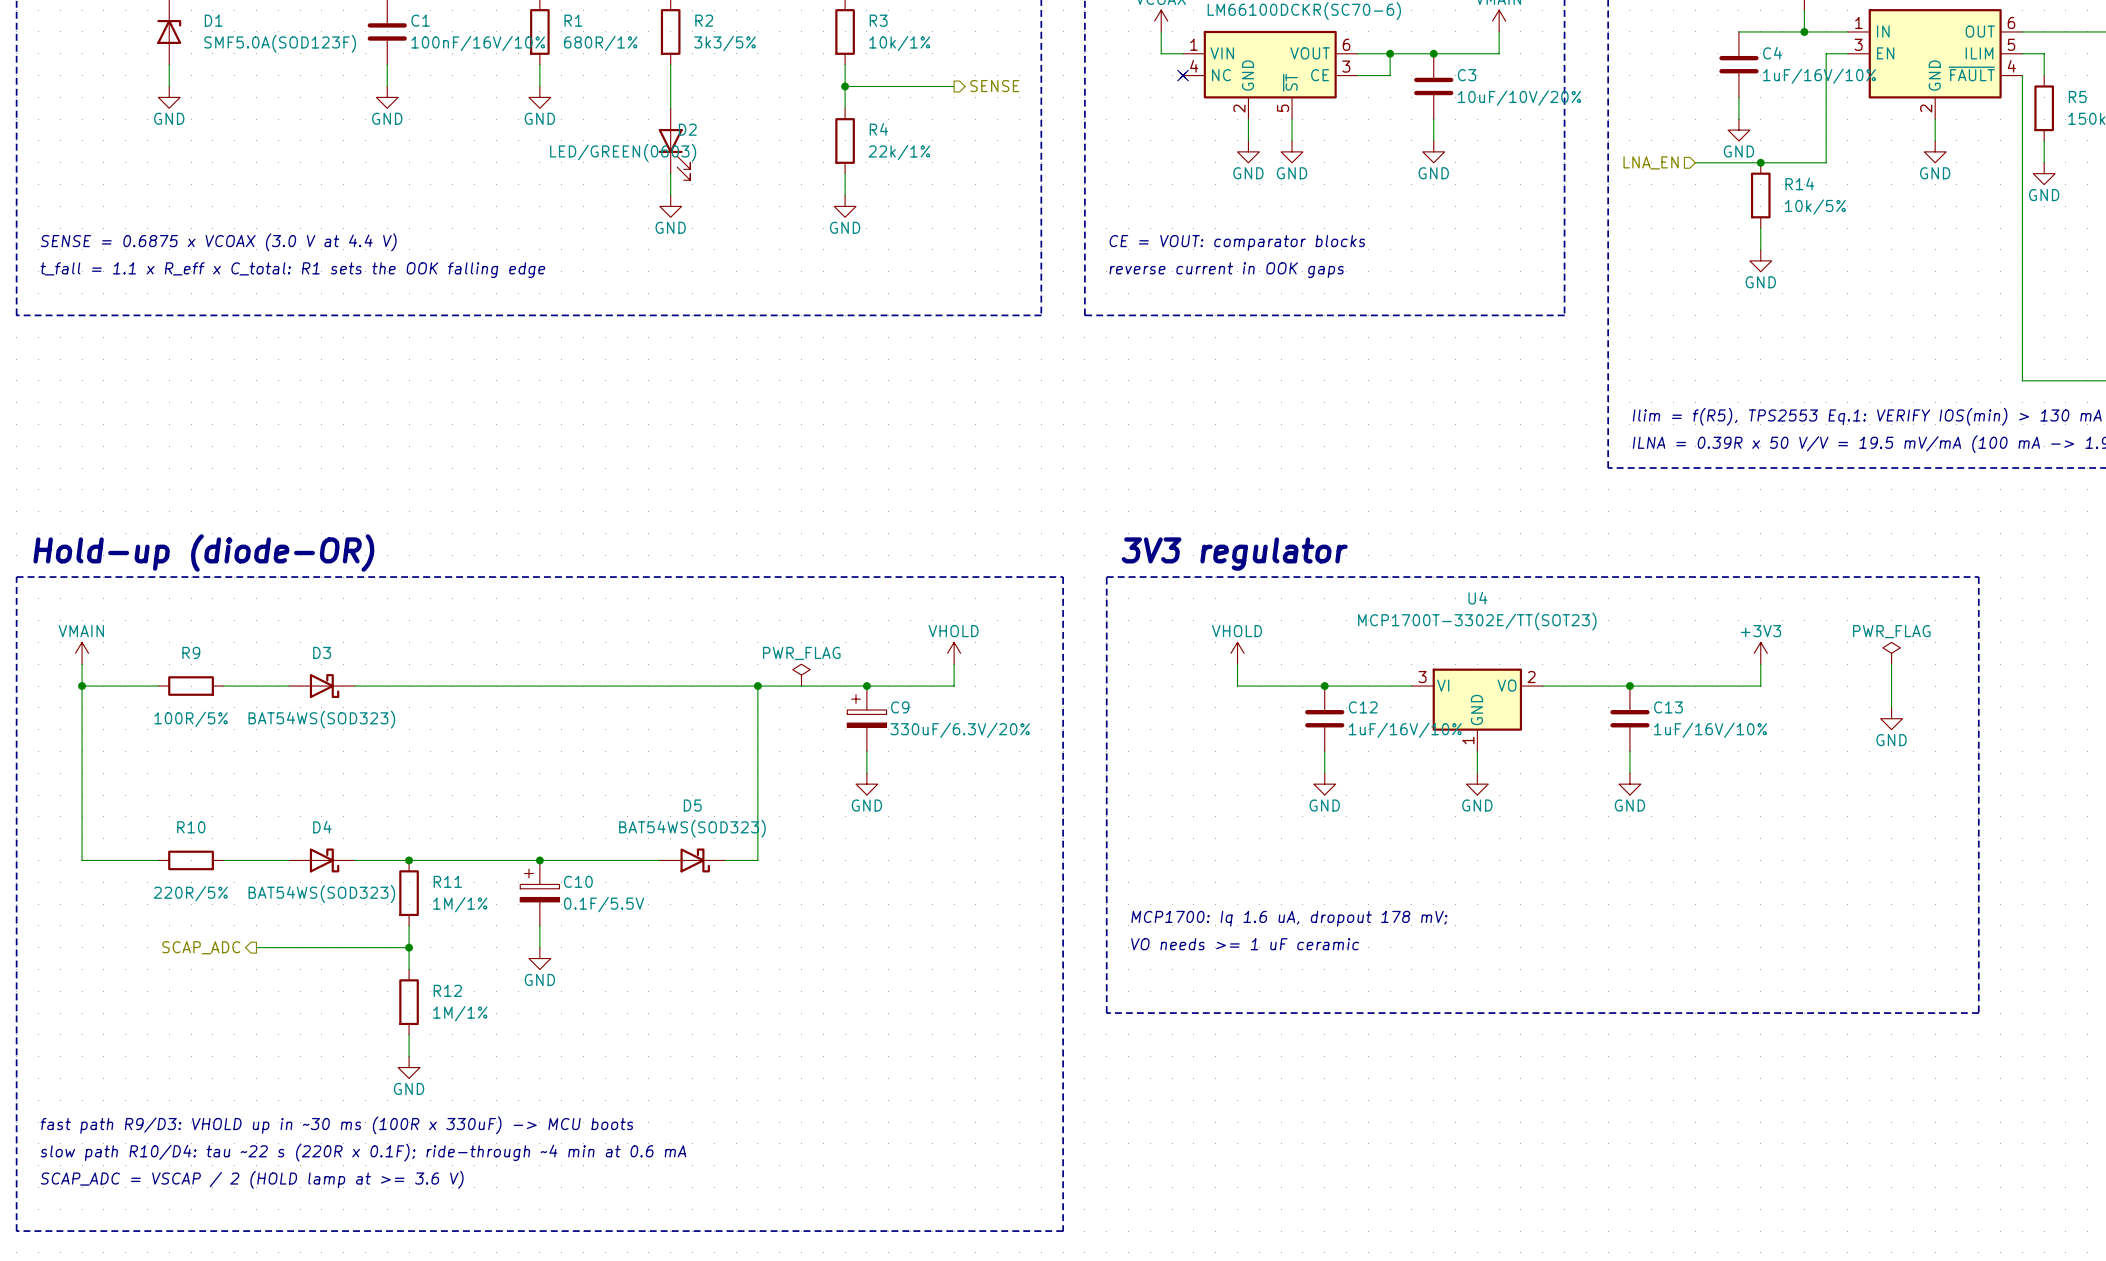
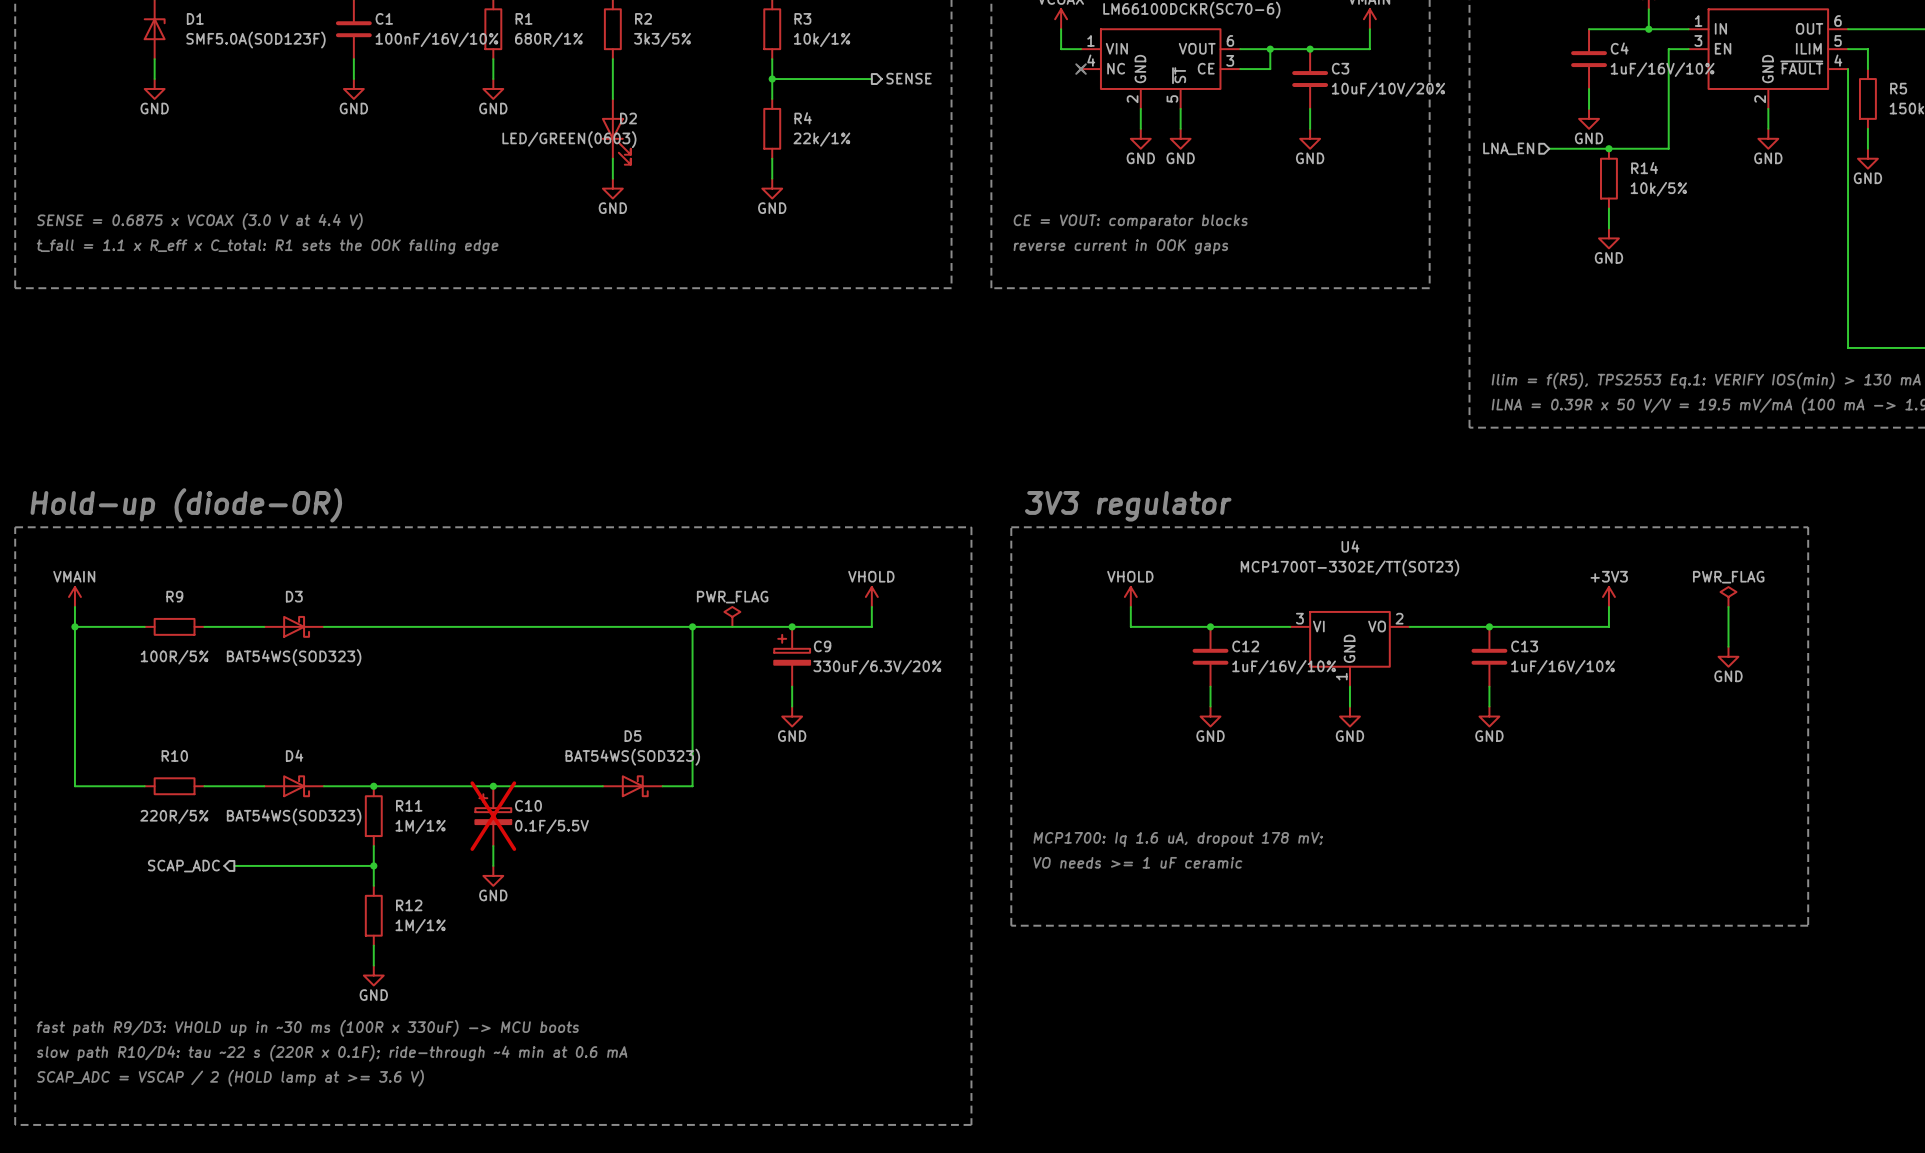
C10 do-not-place cross: none -> (493, 816)

